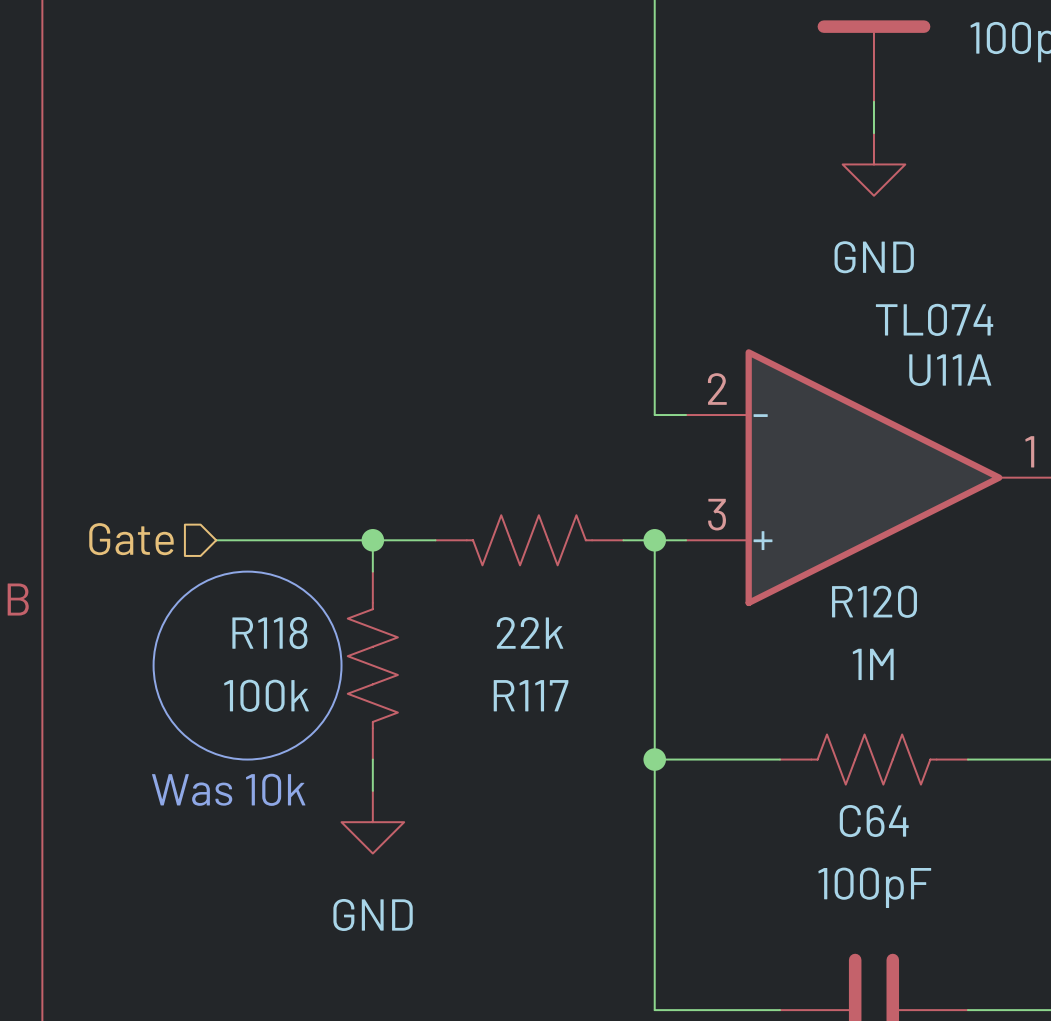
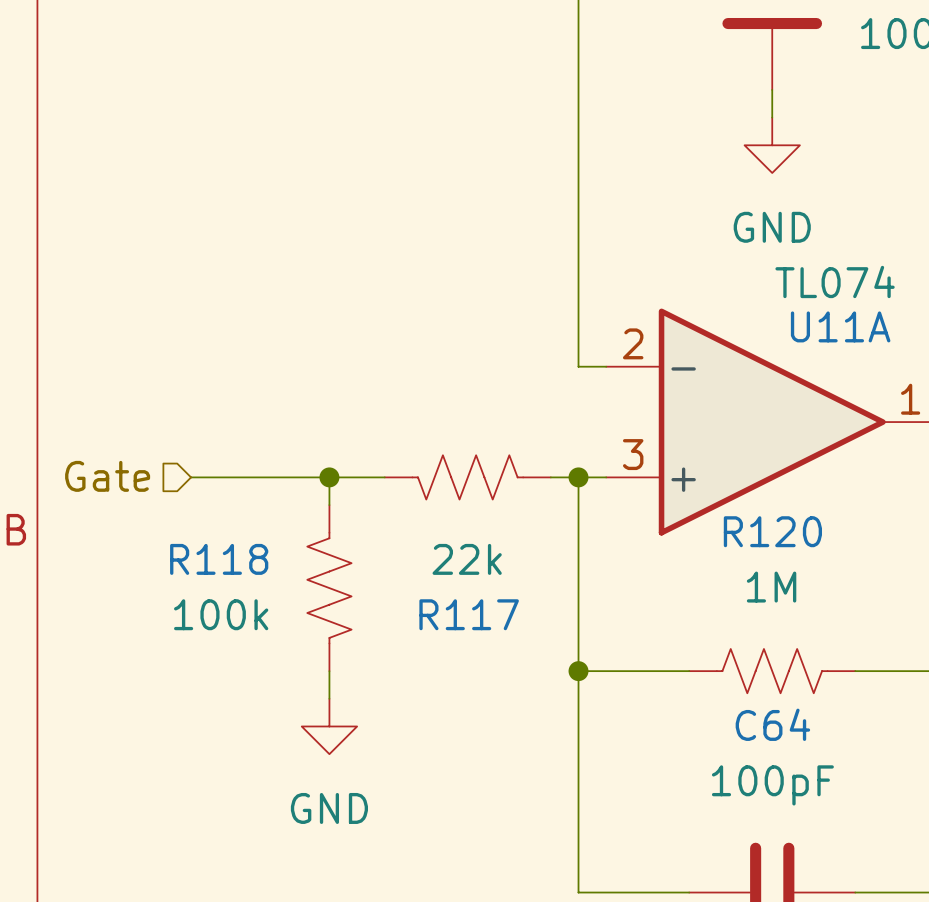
drawing: [153, 571, 342, 760] -> none
text: Was 10k (228, 789) -> none

